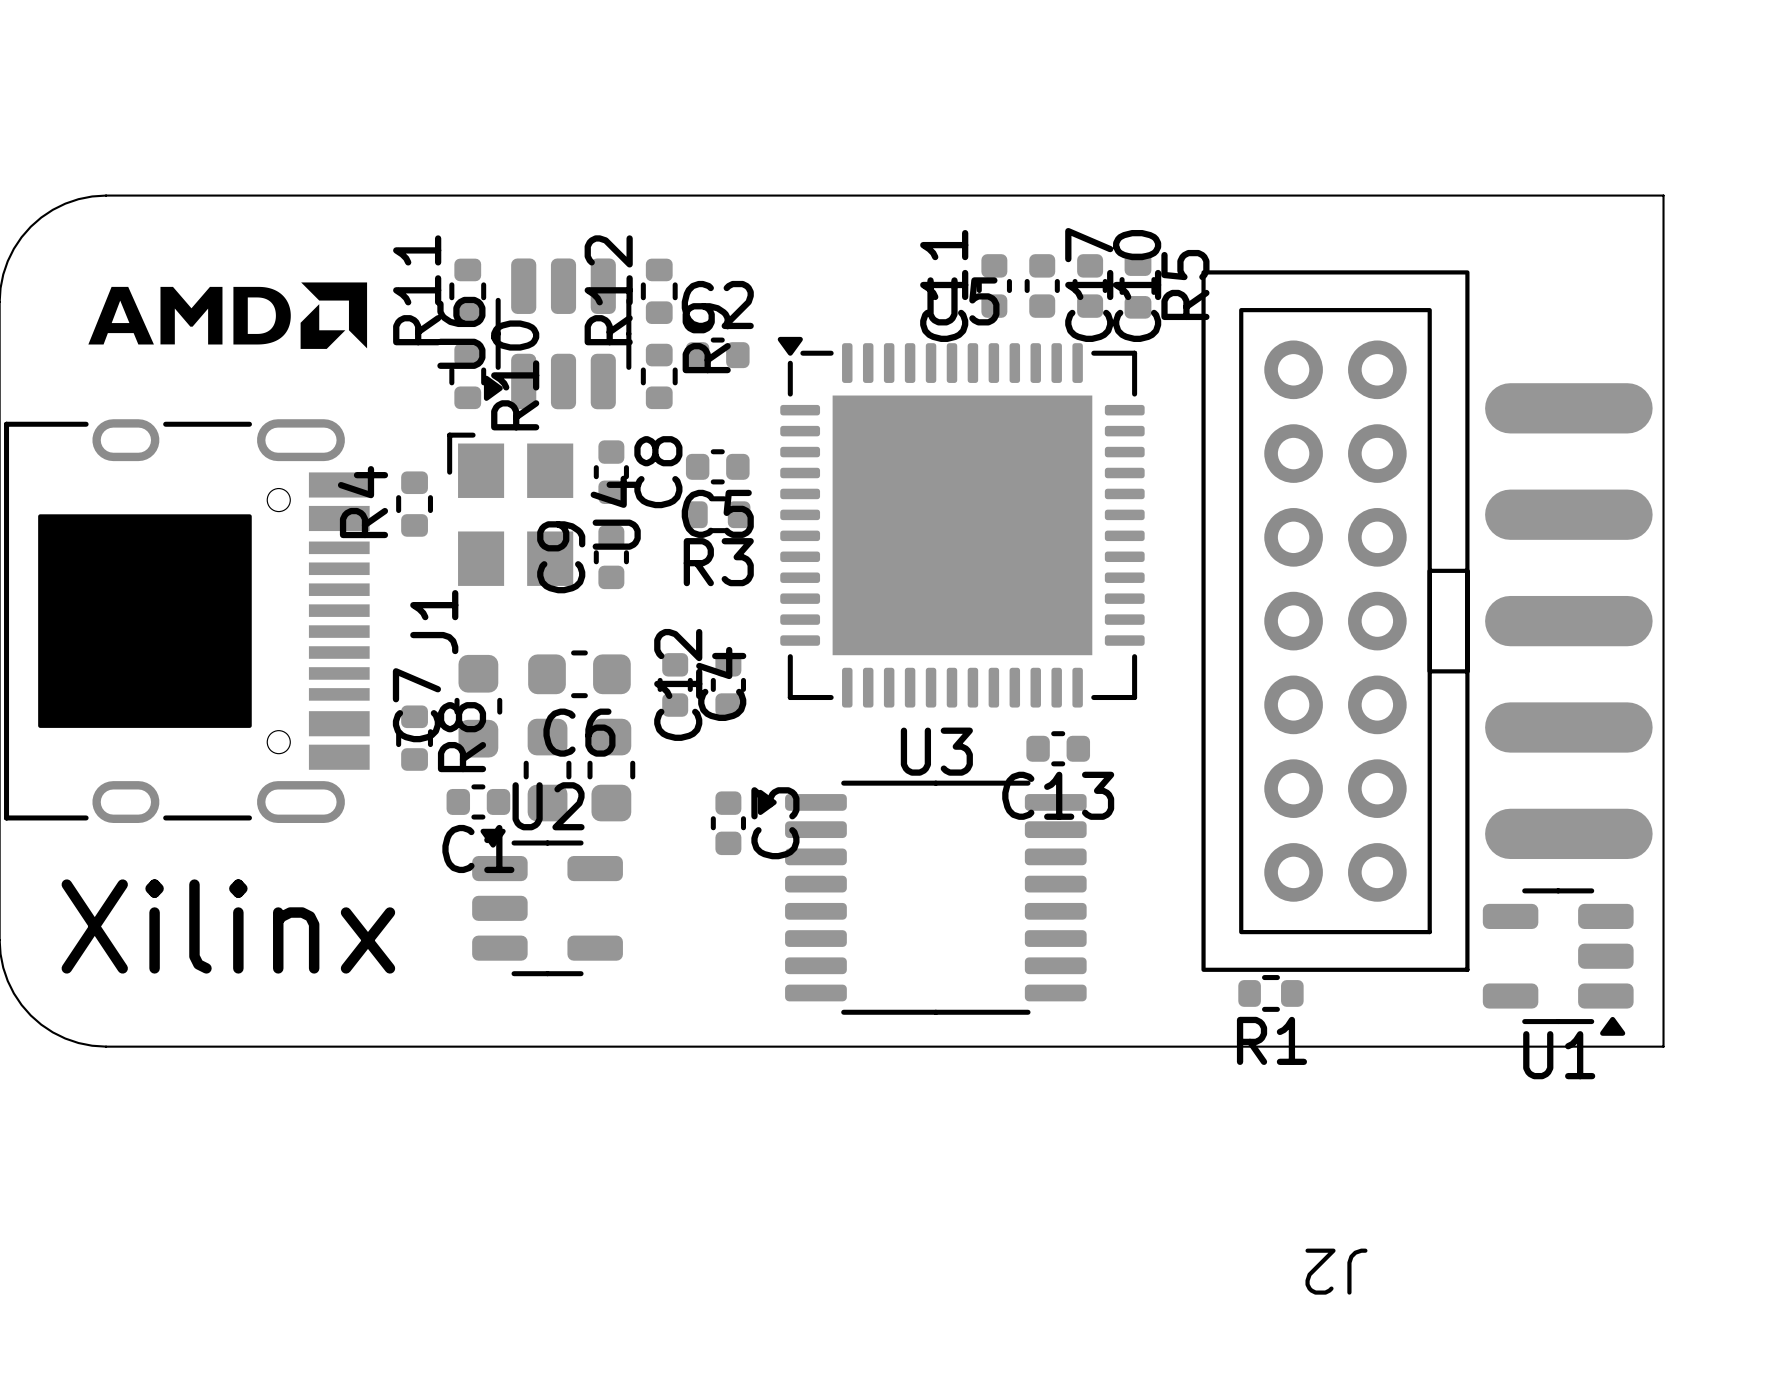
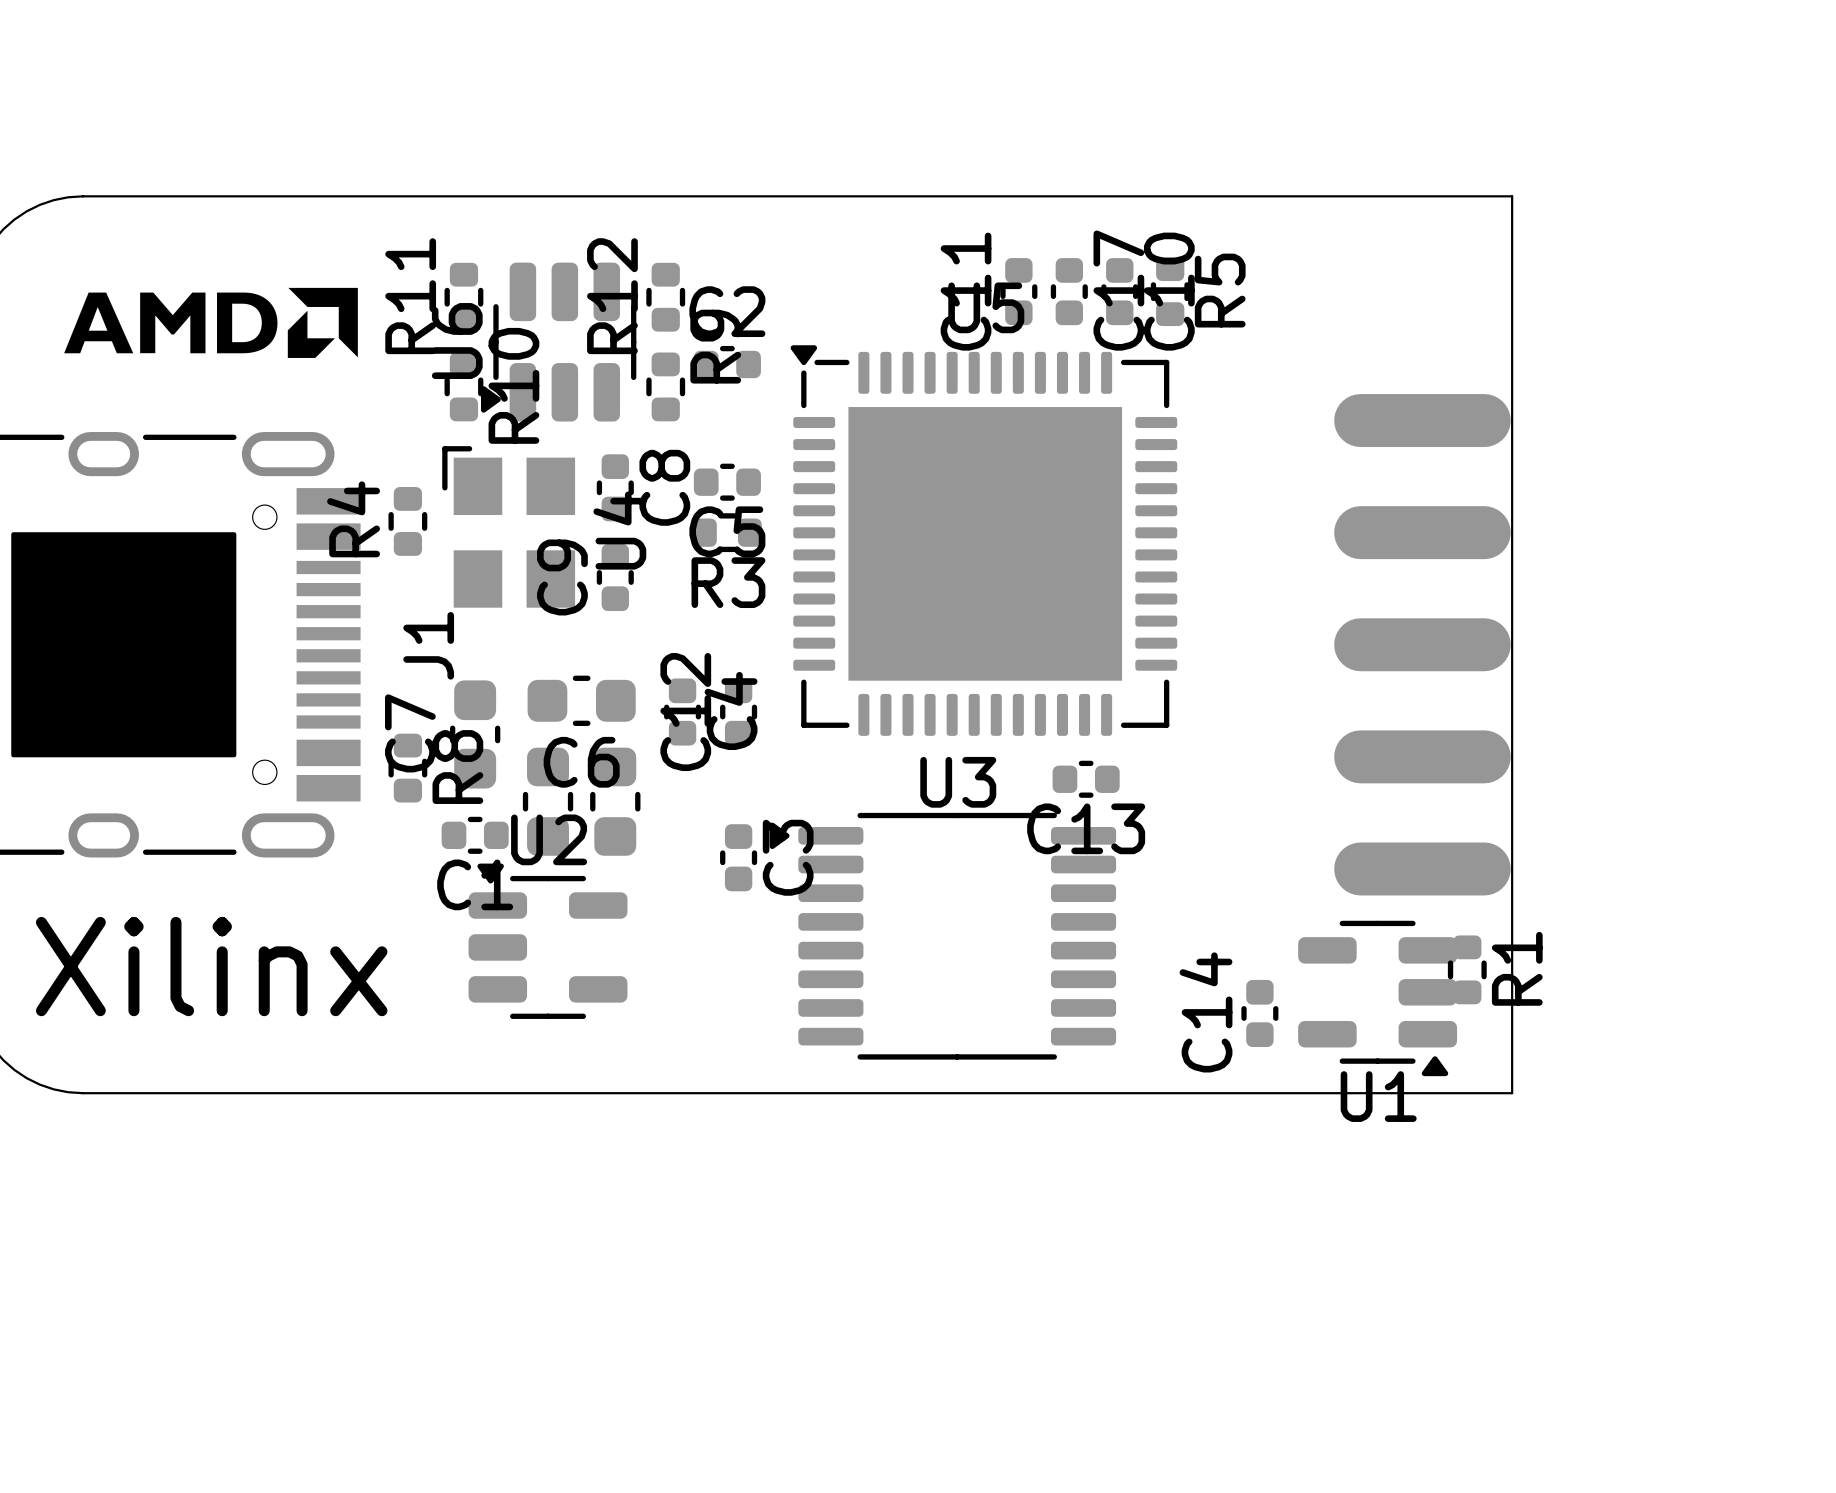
board edge: (1462, 195) (1663, 195) (1663, 1046) (1462, 1046) -> (1512, 196) (1512, 1093)
J2: (1335, 621) -> none
part position: (1568, 621) -> (1422, 644)
U1 position: (1558, 962) -> (1377, 998)
C14: none -> (1259, 1013)
R1 rotation: 0° (1270, 993) -> 90° clockwise (1467, 969)
R1 position: (1270, 993) -> (1467, 969)

